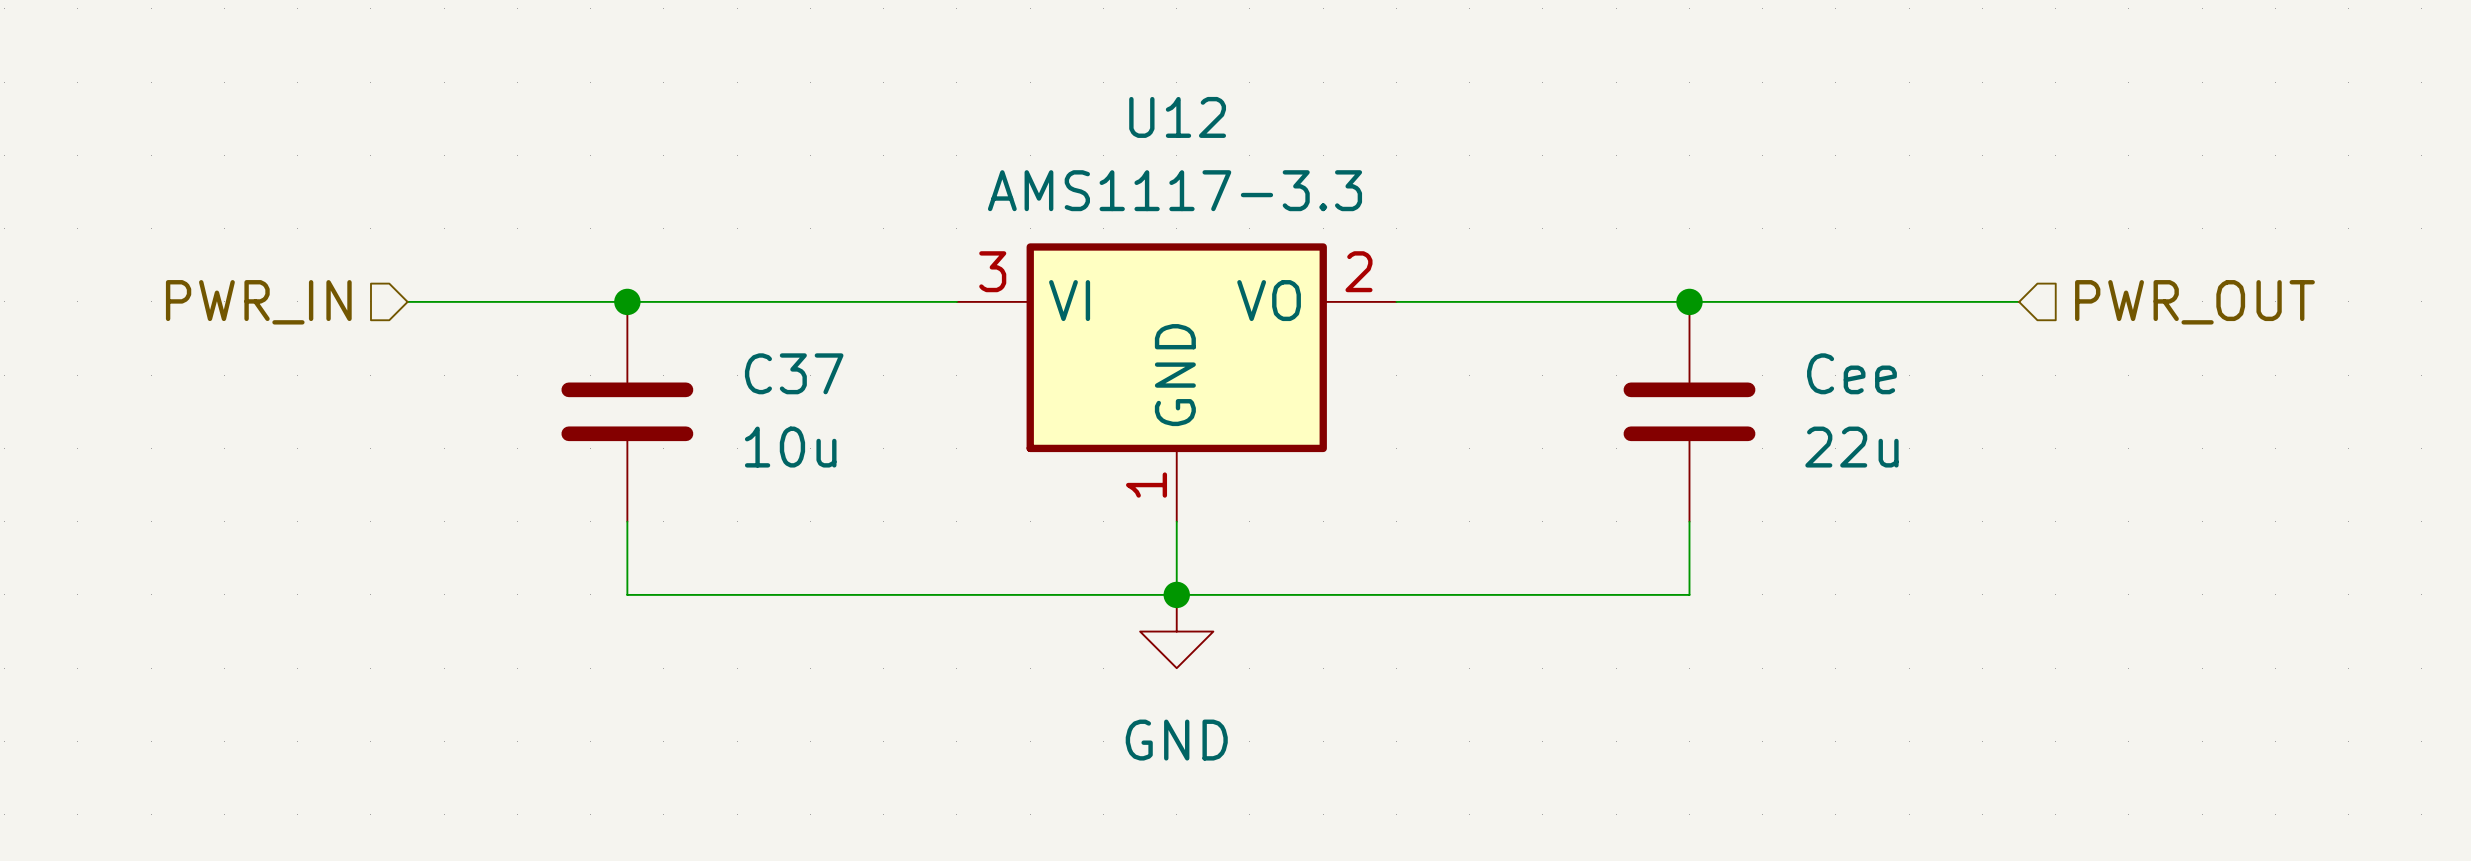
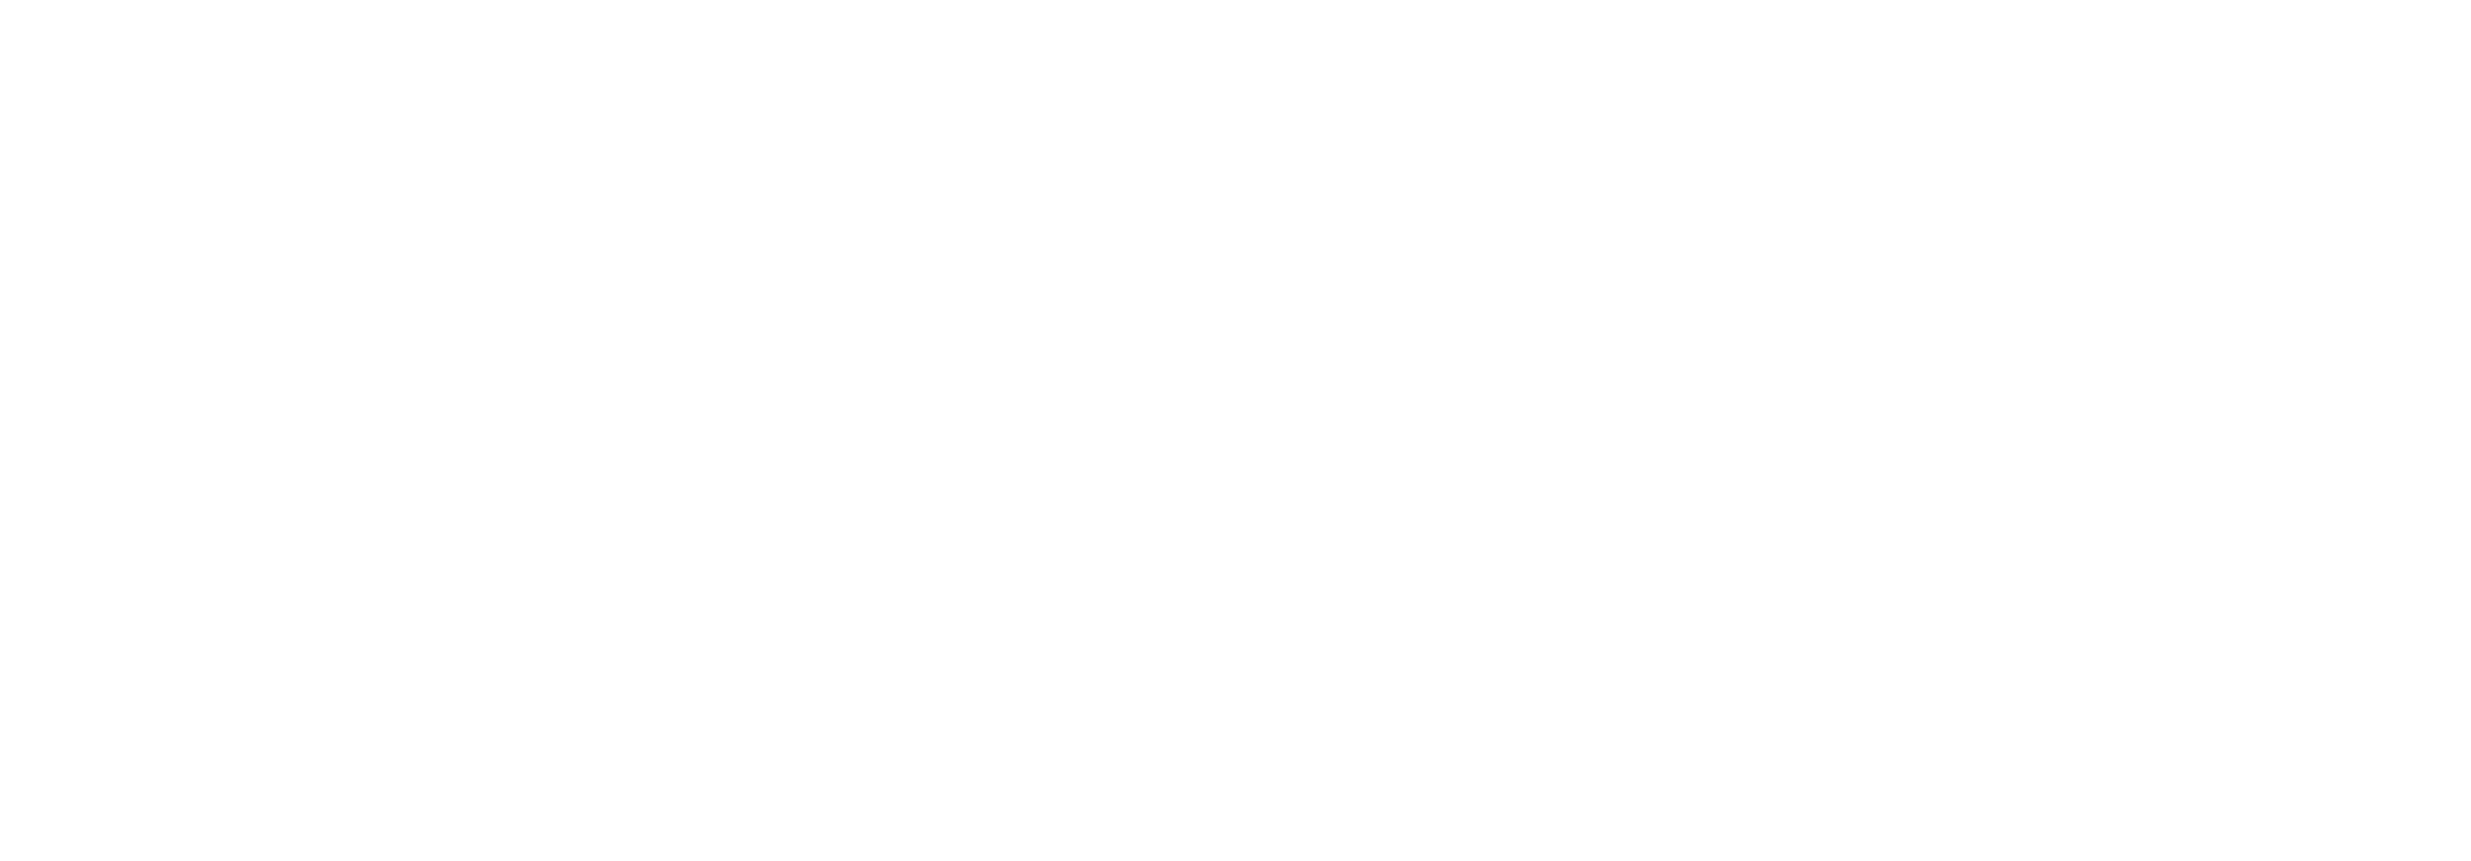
wire: (407, 301) (956, 301) -> none
junction: (627, 301) -> none
wire: (1396, 301) (2019, 301) -> none
junction: (1689, 301) -> none
hierarchical label: PWR_IN (258, 302) -> none
hierarchical label: PWR_OUT (2194, 302) -> none
U12: AMS1117-3.3 (1176, 382) -> none
C37: 10u (627, 411) -> none
Cee: 22u (1689, 411) -> none
wire: (627, 521) (627, 594) (1689, 594) (1689, 521) -> none
wire: (1176, 521) (1176, 594) -> none
junction: (1176, 594) -> none
power symbol: GND (1176, 631) -> none

